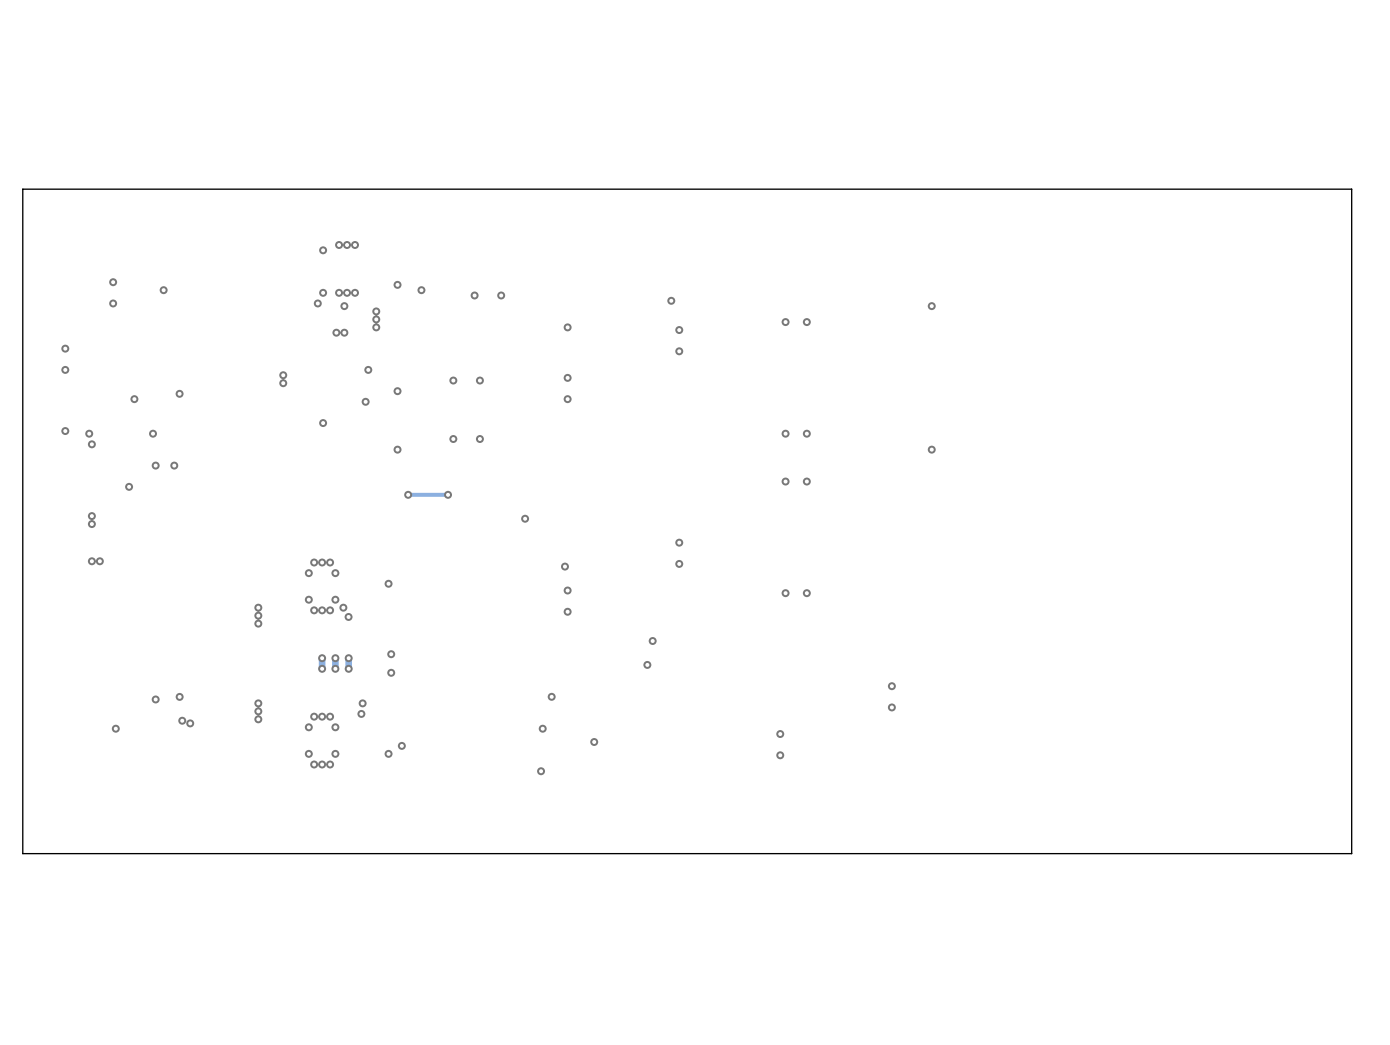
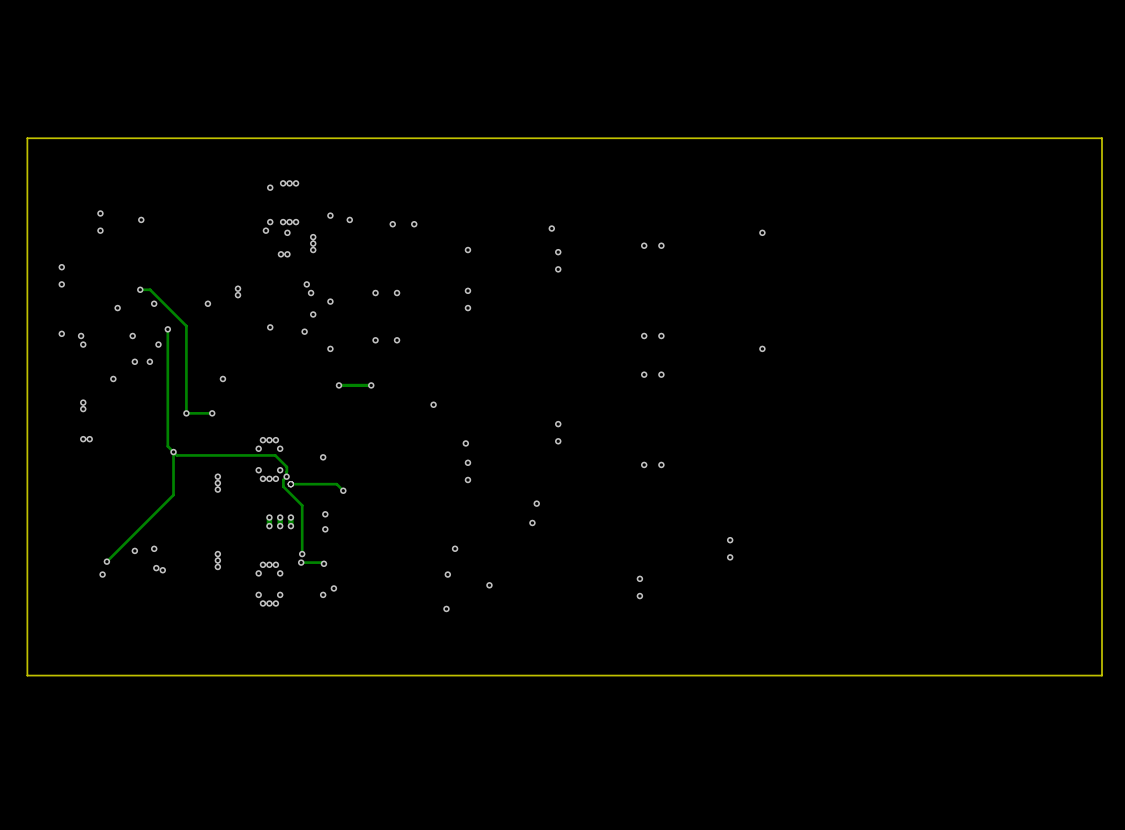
track: none -> (140, 289) (150, 289) (186, 326) (186, 413) (212, 413)
via: none -> (140, 289)
via: none -> (311, 293)
via: none -> (207, 303)
via: (365, 401) -> none
via: none -> (313, 314)
track: none -> (167, 329) (167, 446) (176, 455) (275, 455) (286, 467) (283, 486) (302, 505) (302, 554)
via: none -> (167, 329)
via: none -> (304, 331)
via: none -> (158, 344)
via: none -> (222, 378)
via: none -> (186, 413)
via: none -> (212, 413)
track: none -> (173, 452) (173, 495) (106, 561)
via: none -> (173, 452)
track: none -> (290, 484) (336, 484) (343, 490)
via: none -> (343, 490)
via: none -> (106, 561)
track: none -> (301, 562) (323, 563)
via: none -> (323, 563)

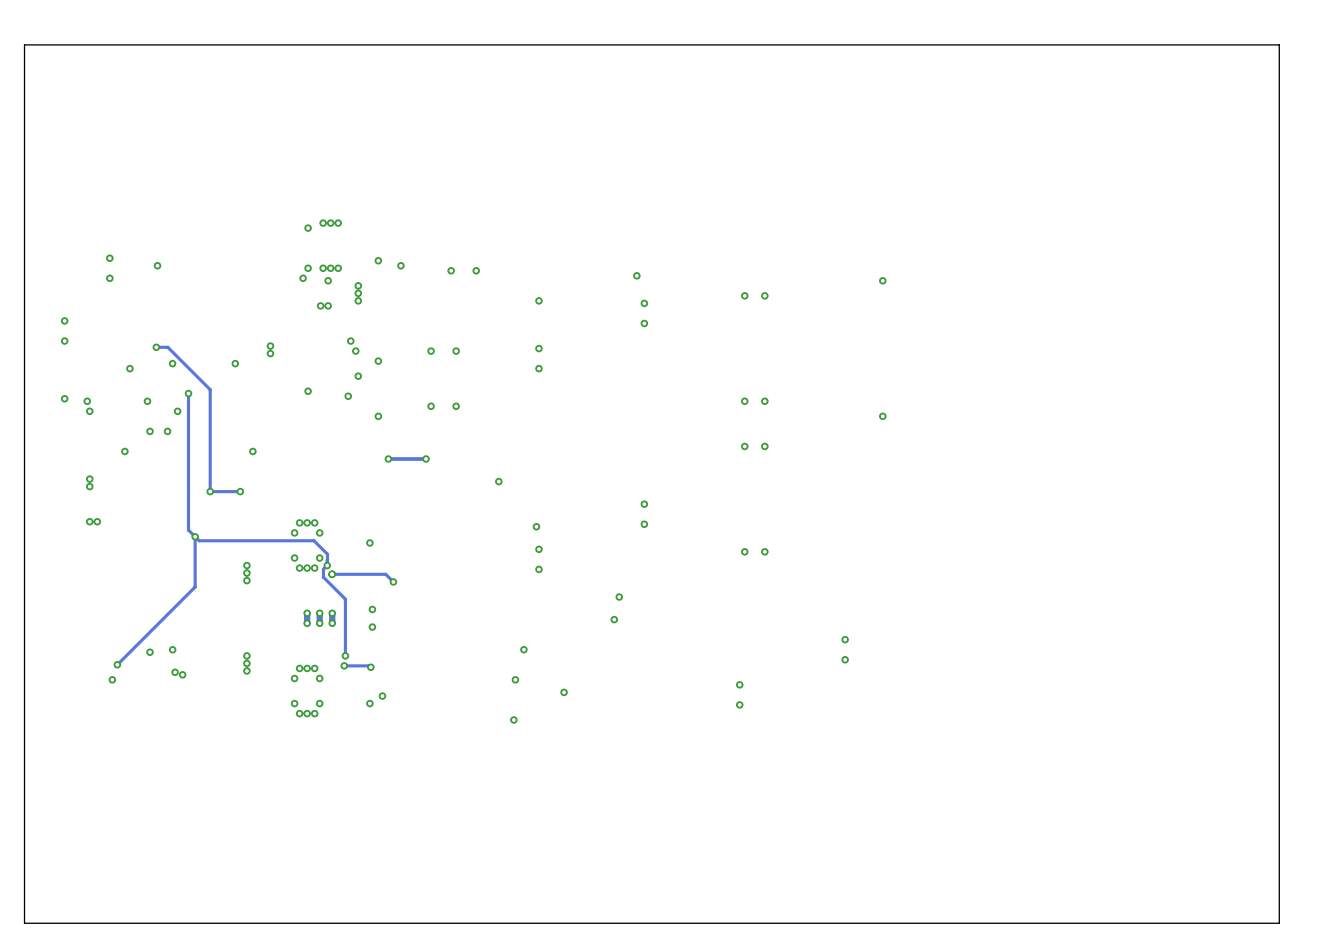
board edge: (1101, 138) (27, 138) -> (1279, 170) (1279, 44) (24, 44) (24, 170)
board edge: (1101, 675) (27, 675) -> (1279, 797) (1279, 923) (24, 923) (24, 797)

